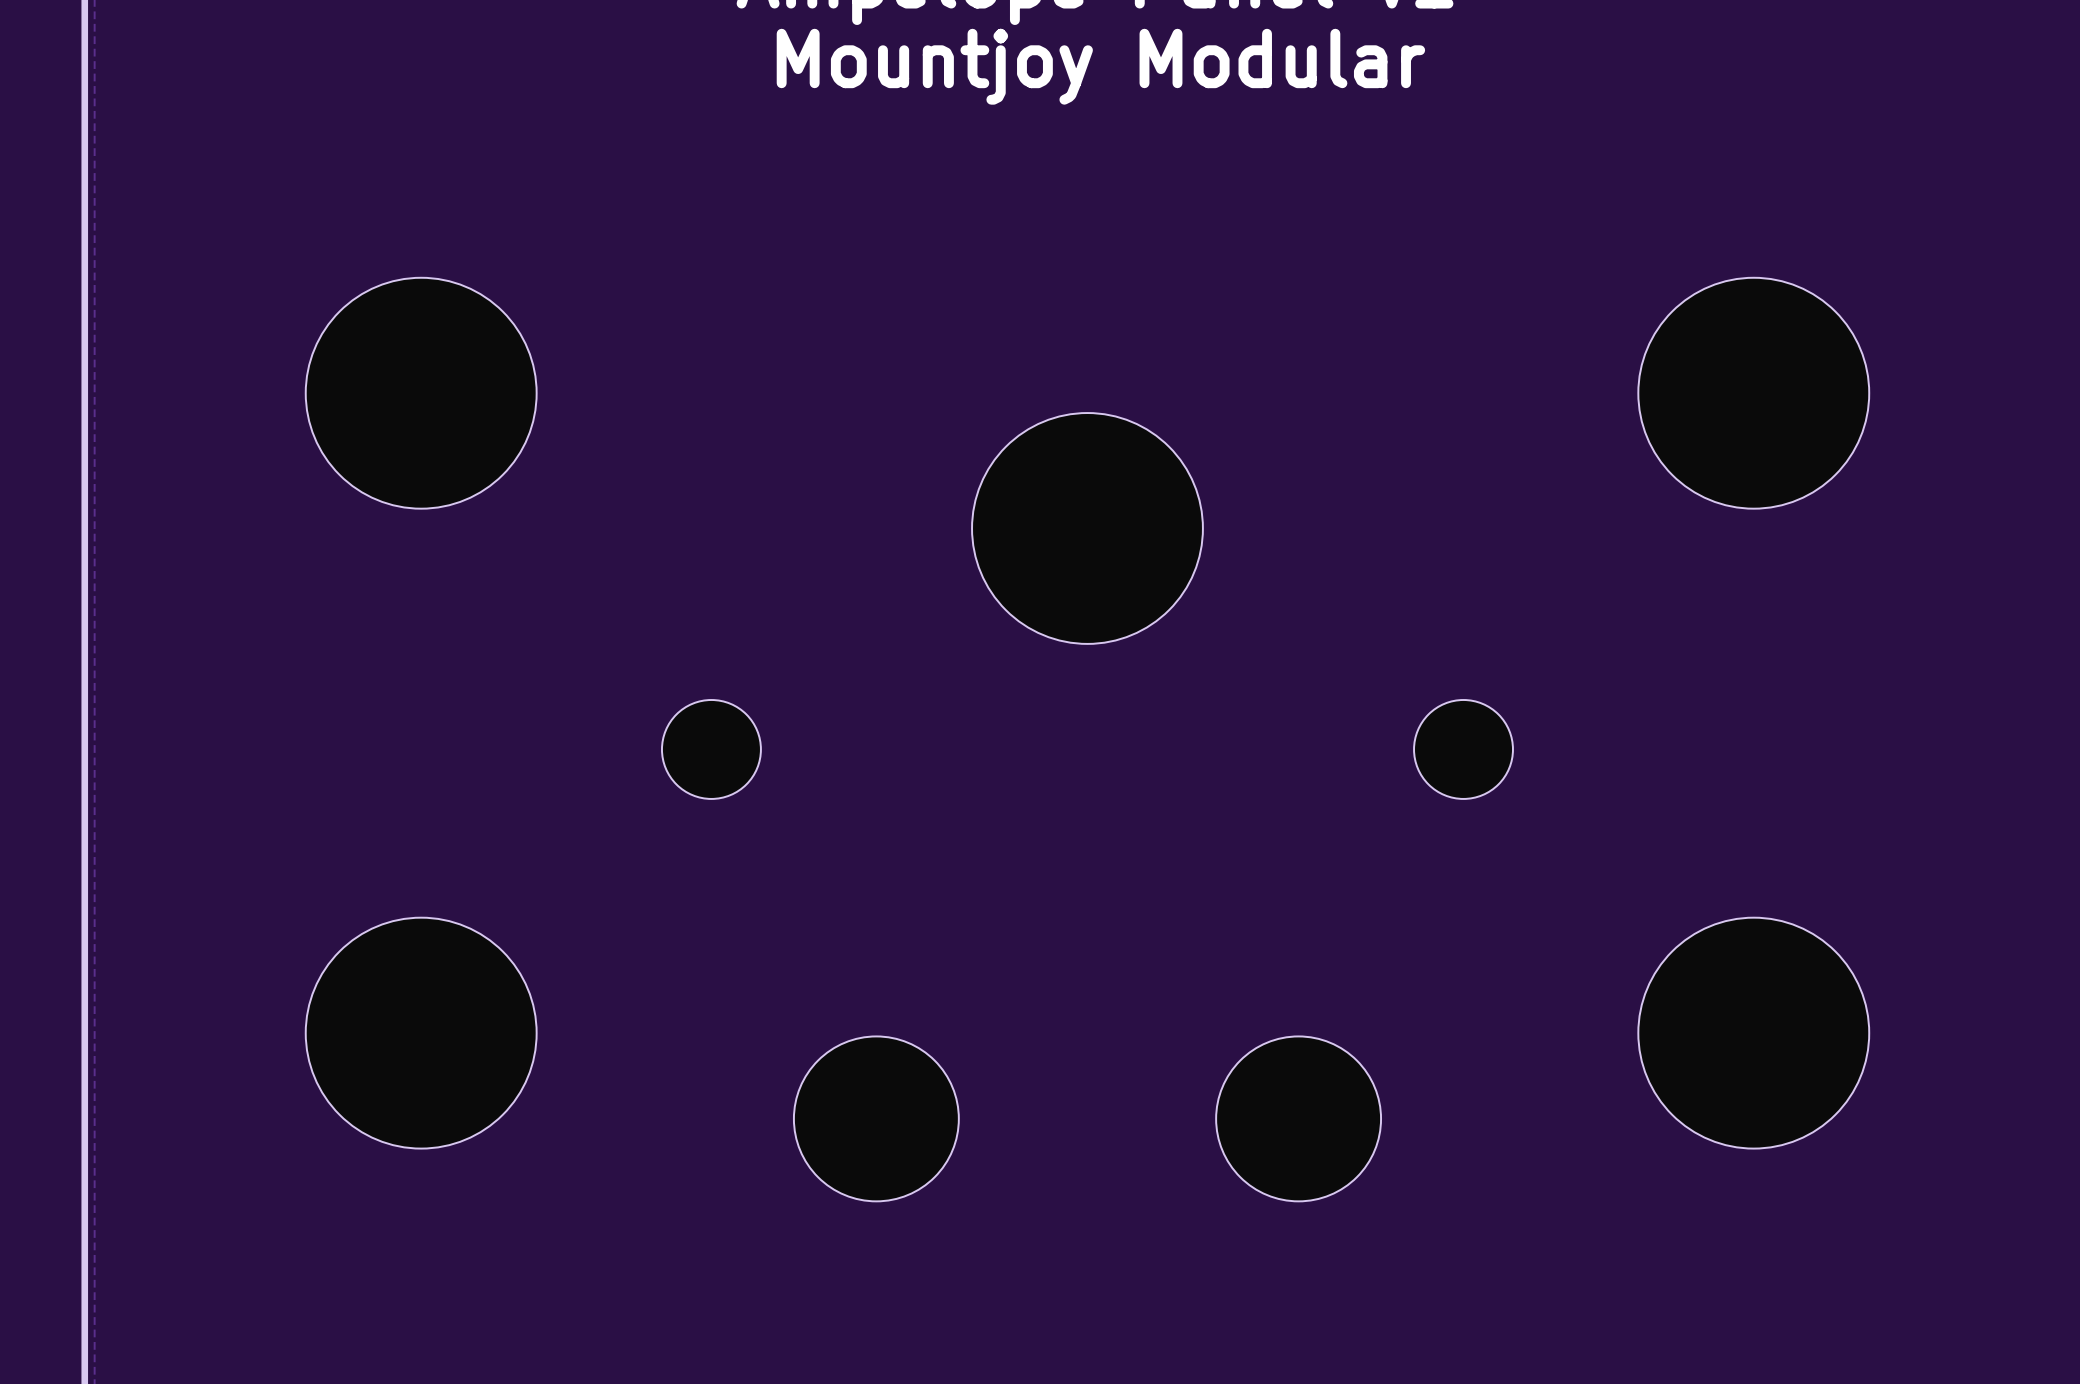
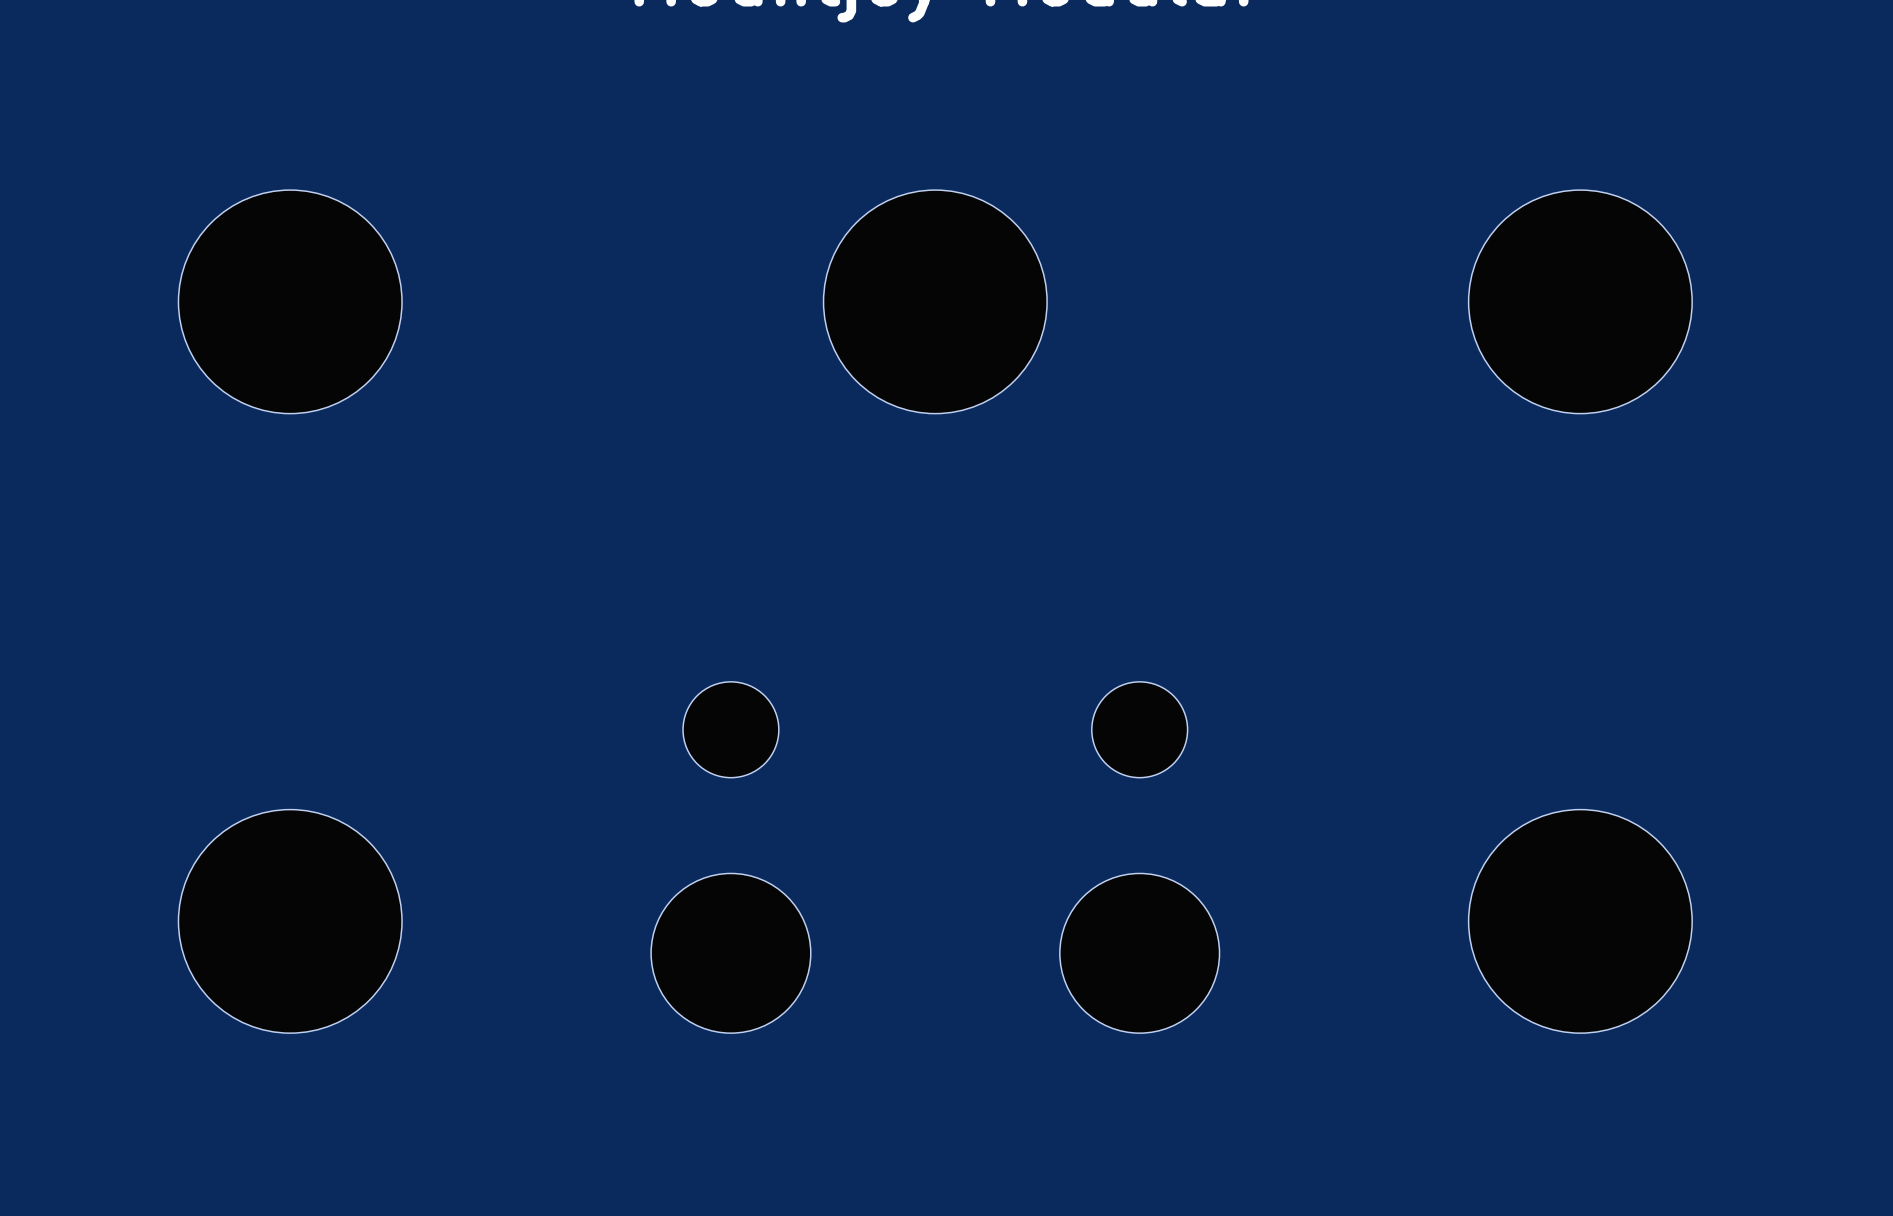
part position: (1087, 528) -> (935, 301)
part position: (711, 749) -> (730, 729)
part position: (1463, 749) -> (1139, 729)
part position: (876, 1118) -> (730, 953)
part position: (1298, 1118) -> (1139, 953)

